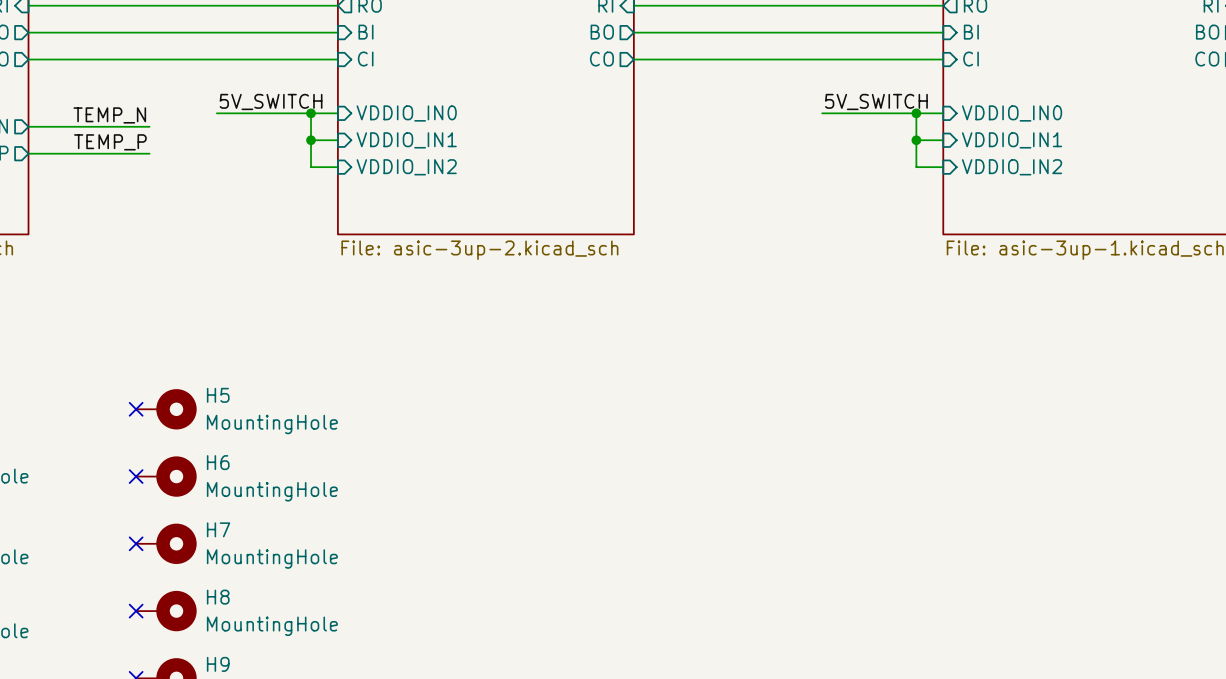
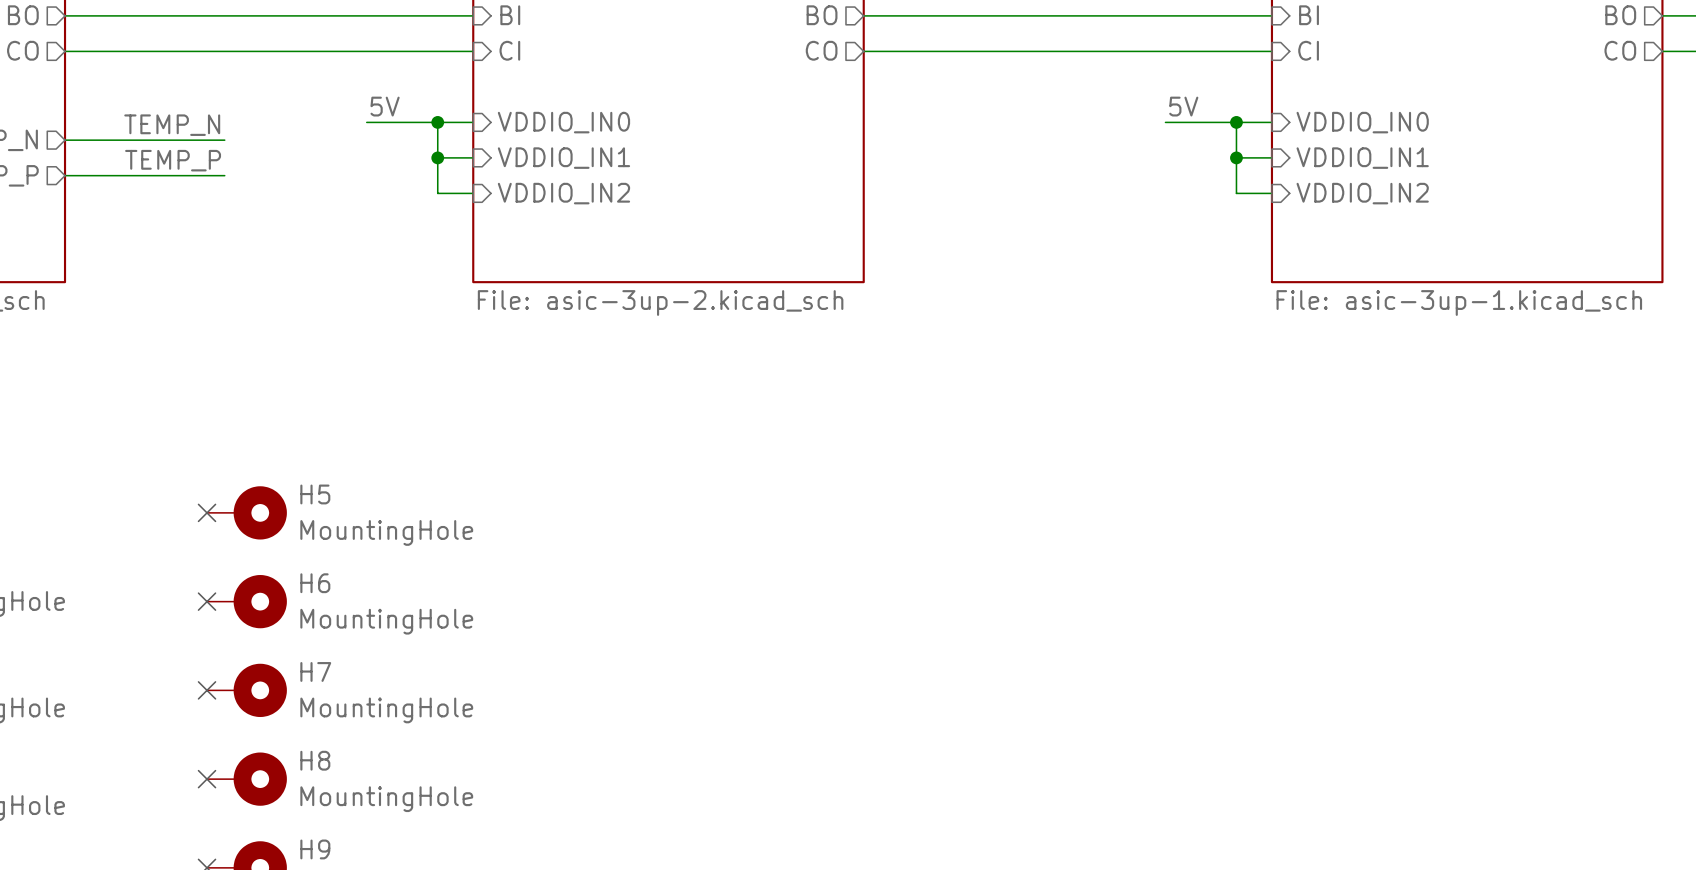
label: 5V_SWITCH (271, 101) -> none
label: none -> 5V (385, 106)
label: 5V_SWITCH (876, 101) -> none
label: none -> 5V (1183, 106)
wire: (216, 113) (257, 113) -> none
wire: (822, 113) (862, 113) -> none

